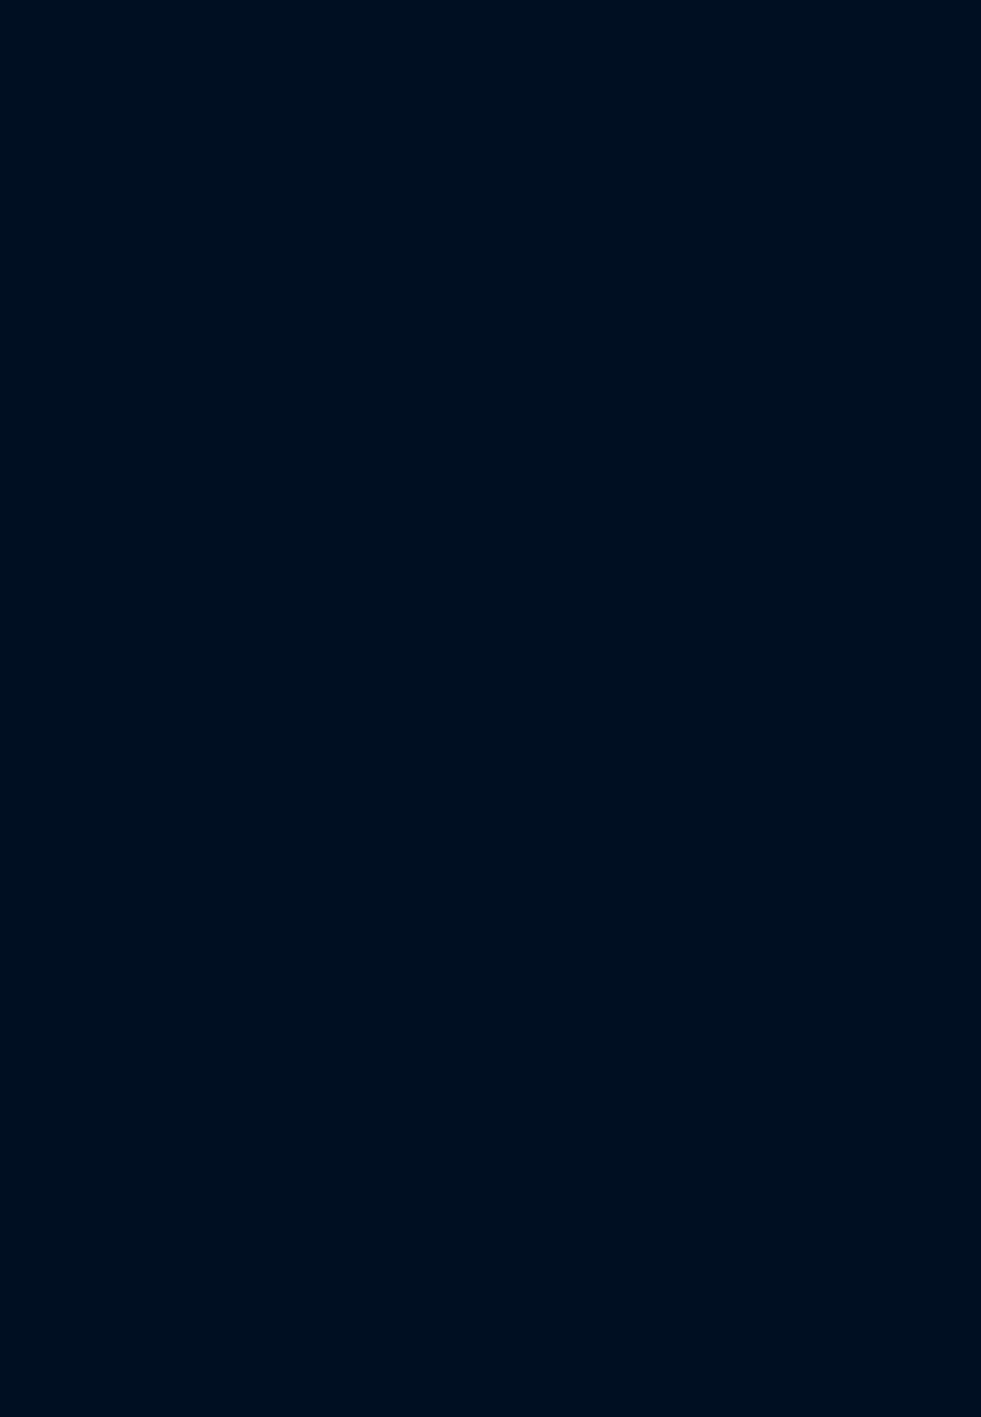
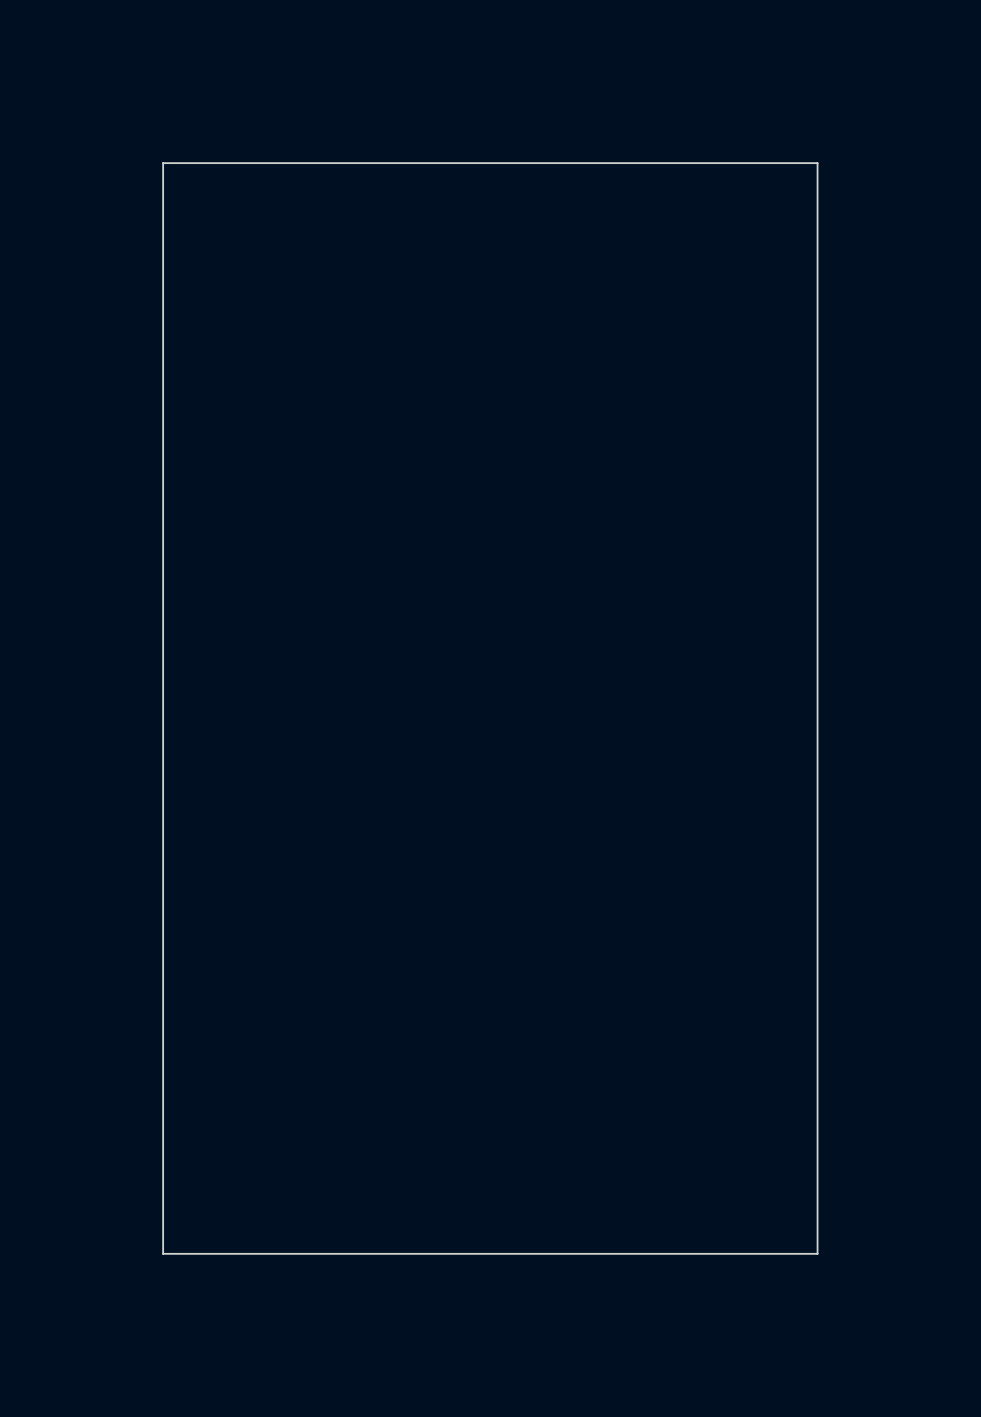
board edge: none -> (163, 163) (817, 163) (817, 1253) (163, 1253) (163, 163)

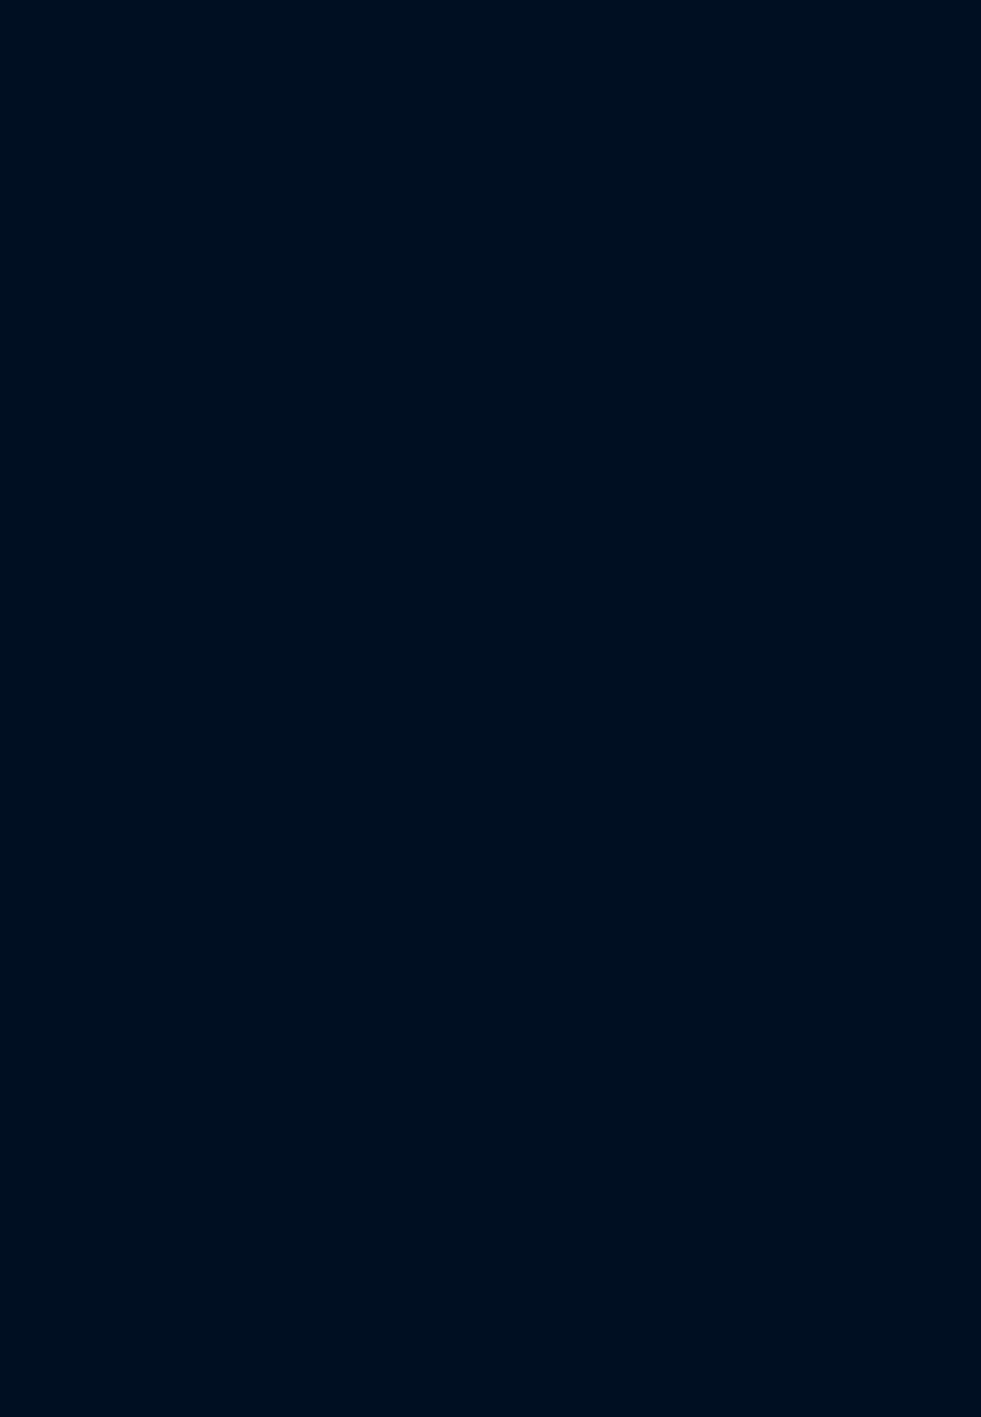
board edge: (163, 163) (817, 163) (817, 1253) (163, 1253) (163, 163) -> none

